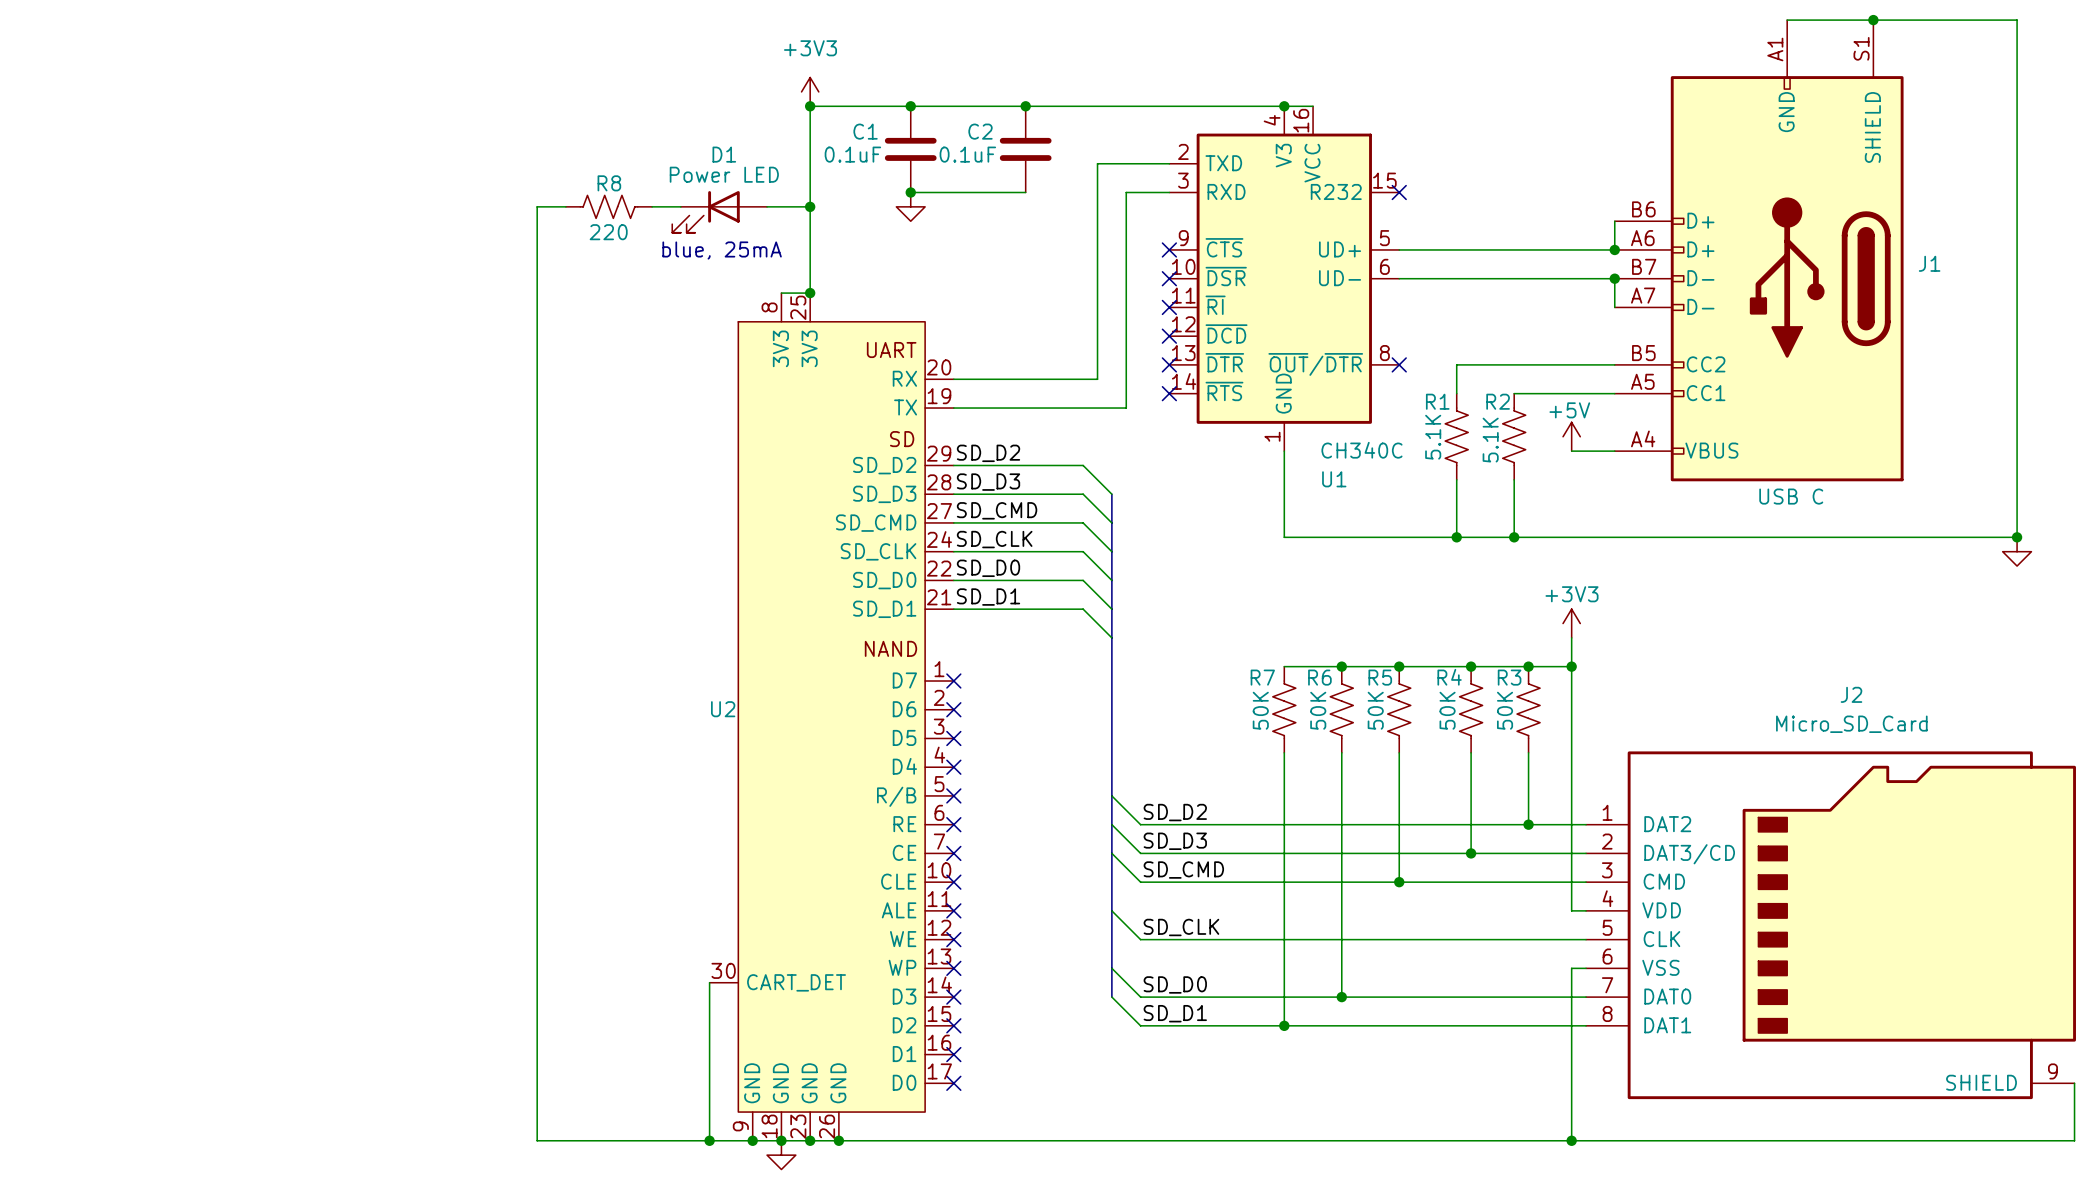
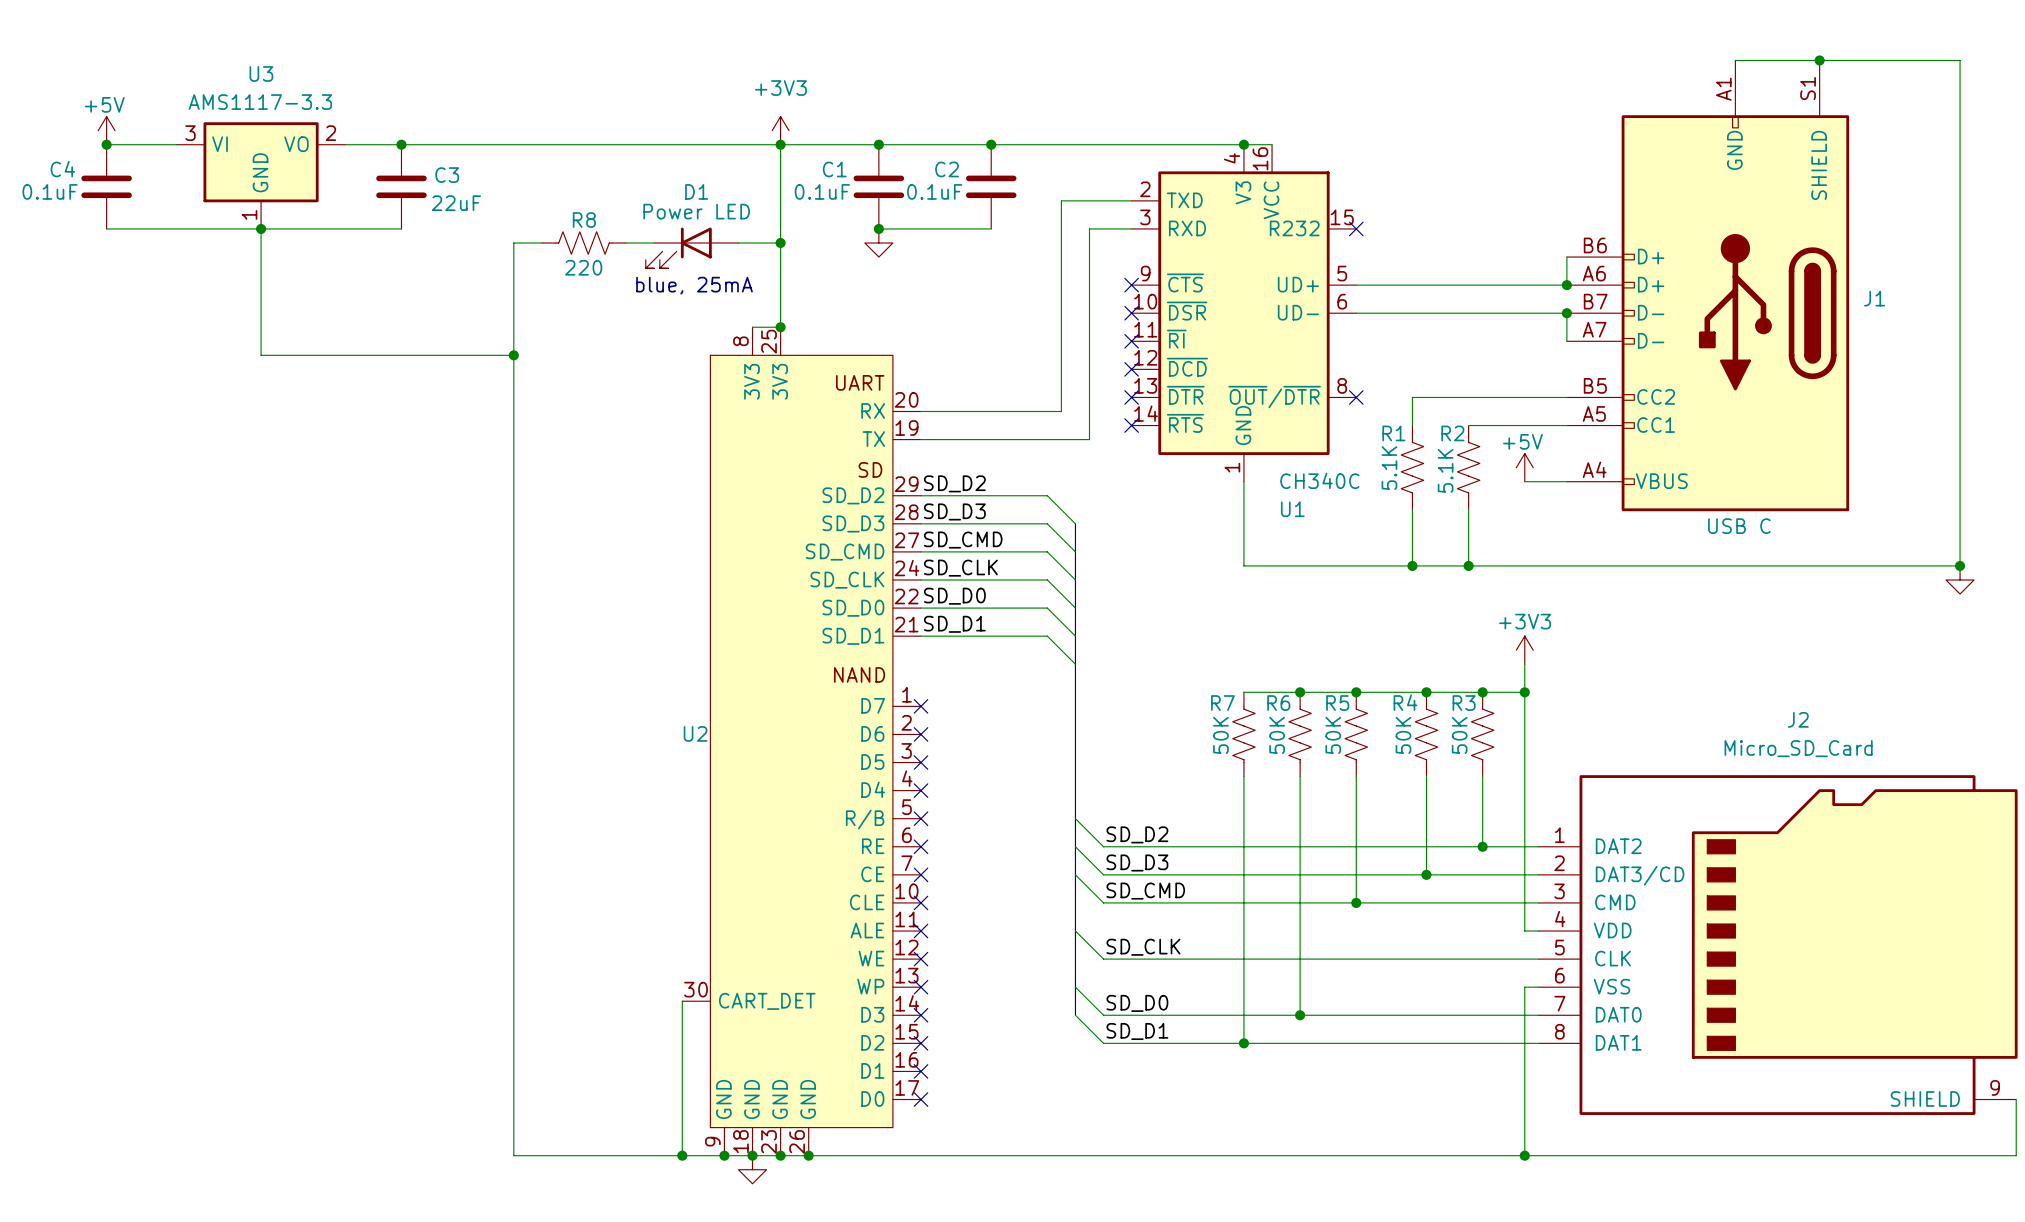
power symbol: none -> +5V (106, 130)
wire: none -> (106, 144) (176, 144)
junction: none -> (106, 144)
wire: none -> (345, 144) (780, 144)
junction: none -> (401, 144)
U3: none -> AMS1117-3.3 (261, 175)
C4: none -> 0.1uF (106, 186)
C3: none -> 22uF (401, 186)
wire: none -> (106, 228) (401, 228)
wire: none -> (261, 228) (261, 355) (513, 355)
junction: none -> (261, 228)
junction: none -> (513, 355)

